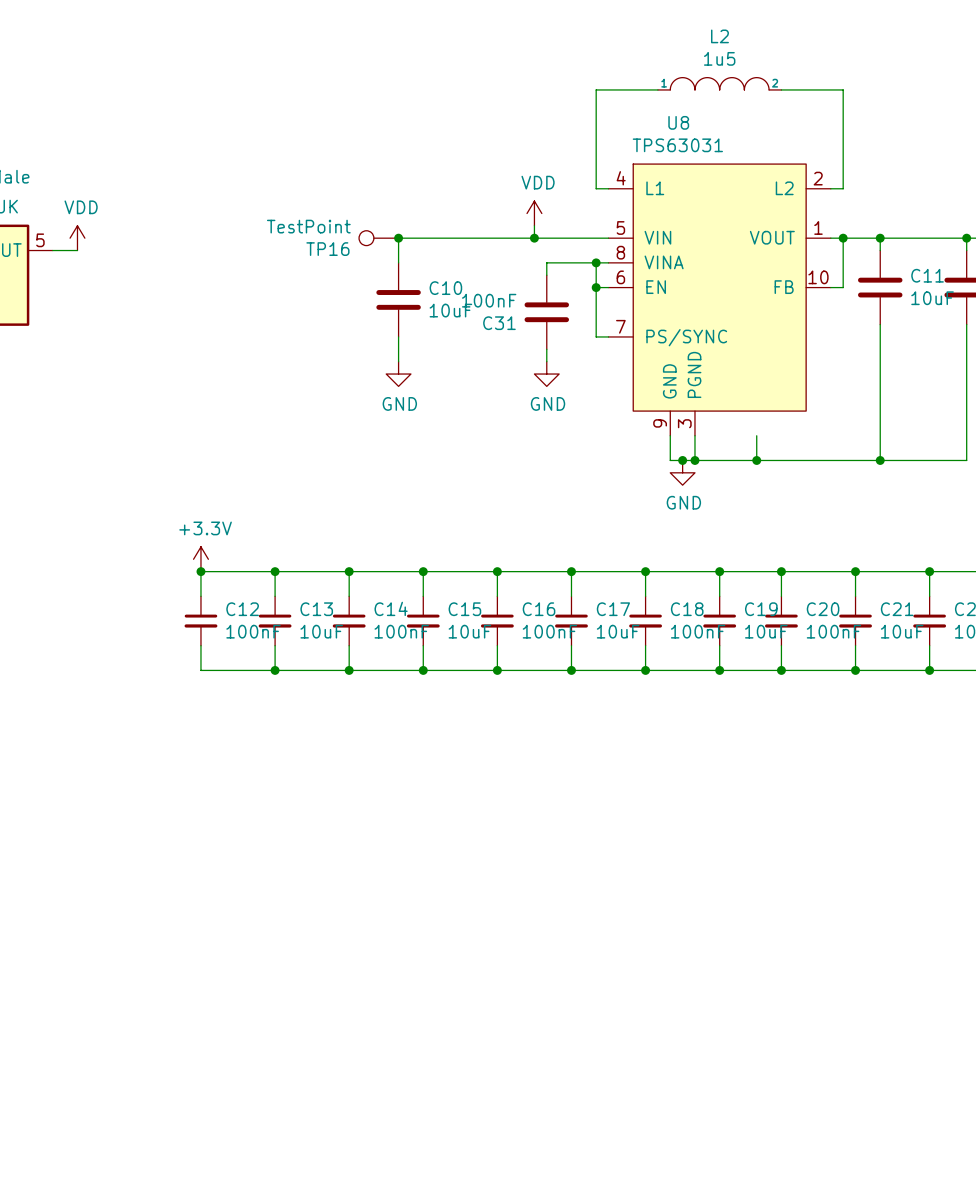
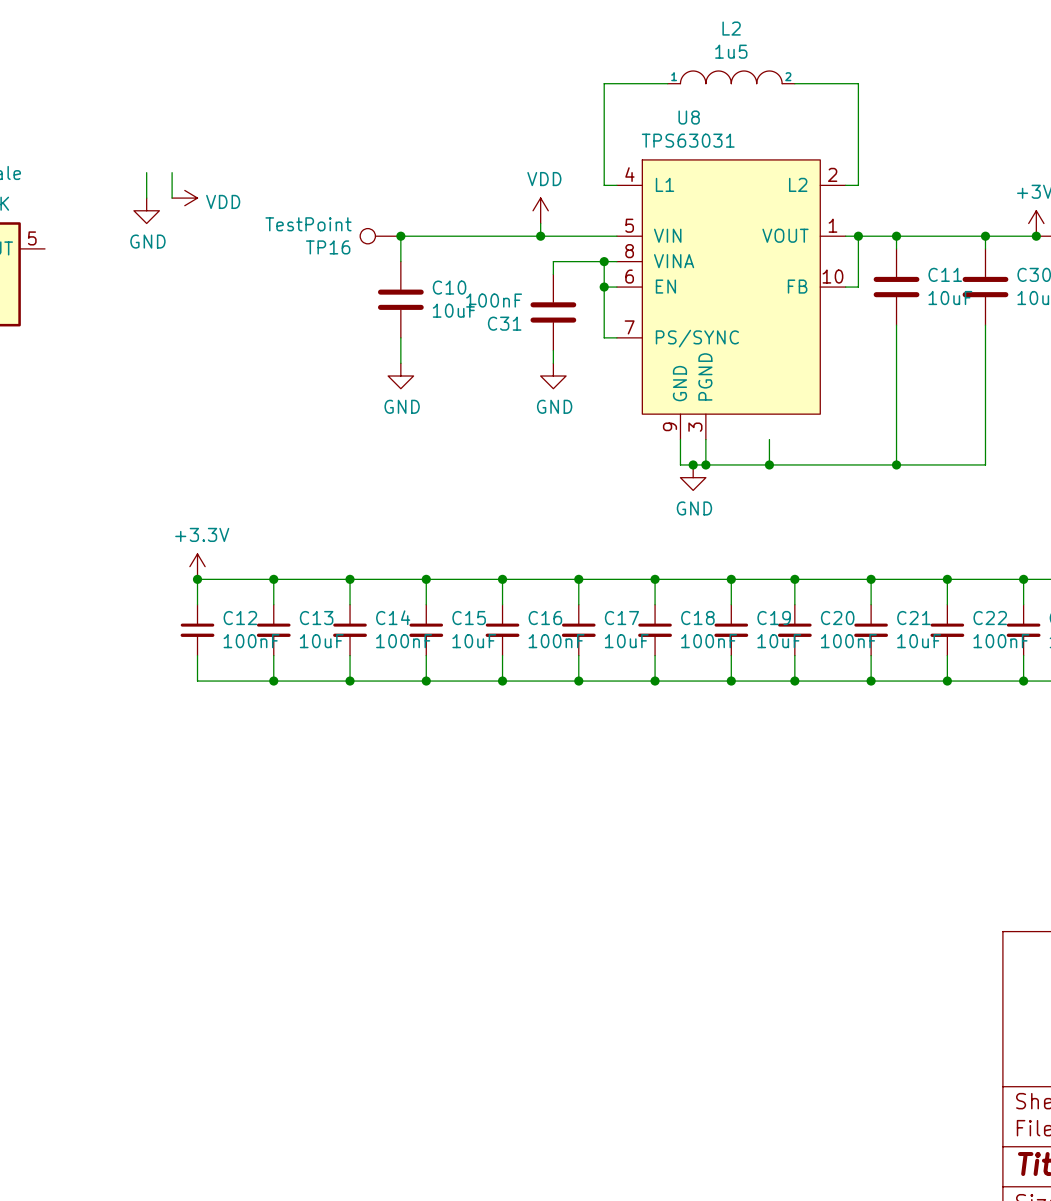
wire: none -> (146, 172) (146, 198)
wire: none -> (172, 172) (172, 198)
power symbol: none -> GND (146, 210)
power symbol rotation: 0° (77, 238) -> 90° clockwise (184, 198)
power symbol position: VDD (77, 238) -> VDD (184, 198)
wire: (52, 250) (77, 250) -> none

